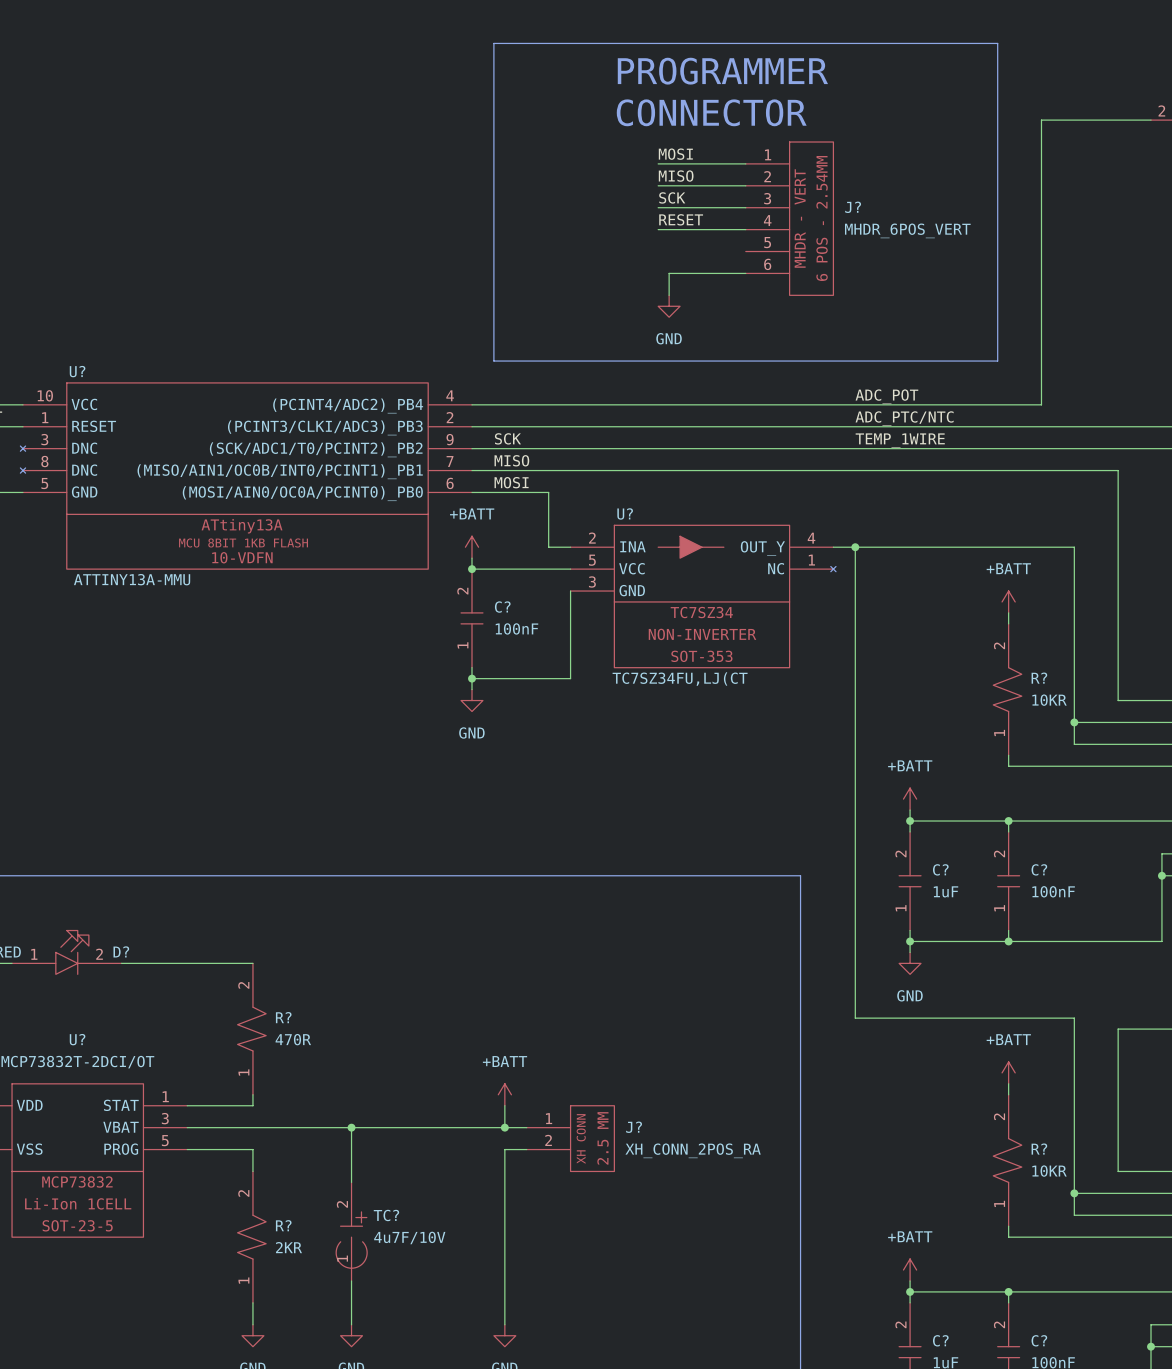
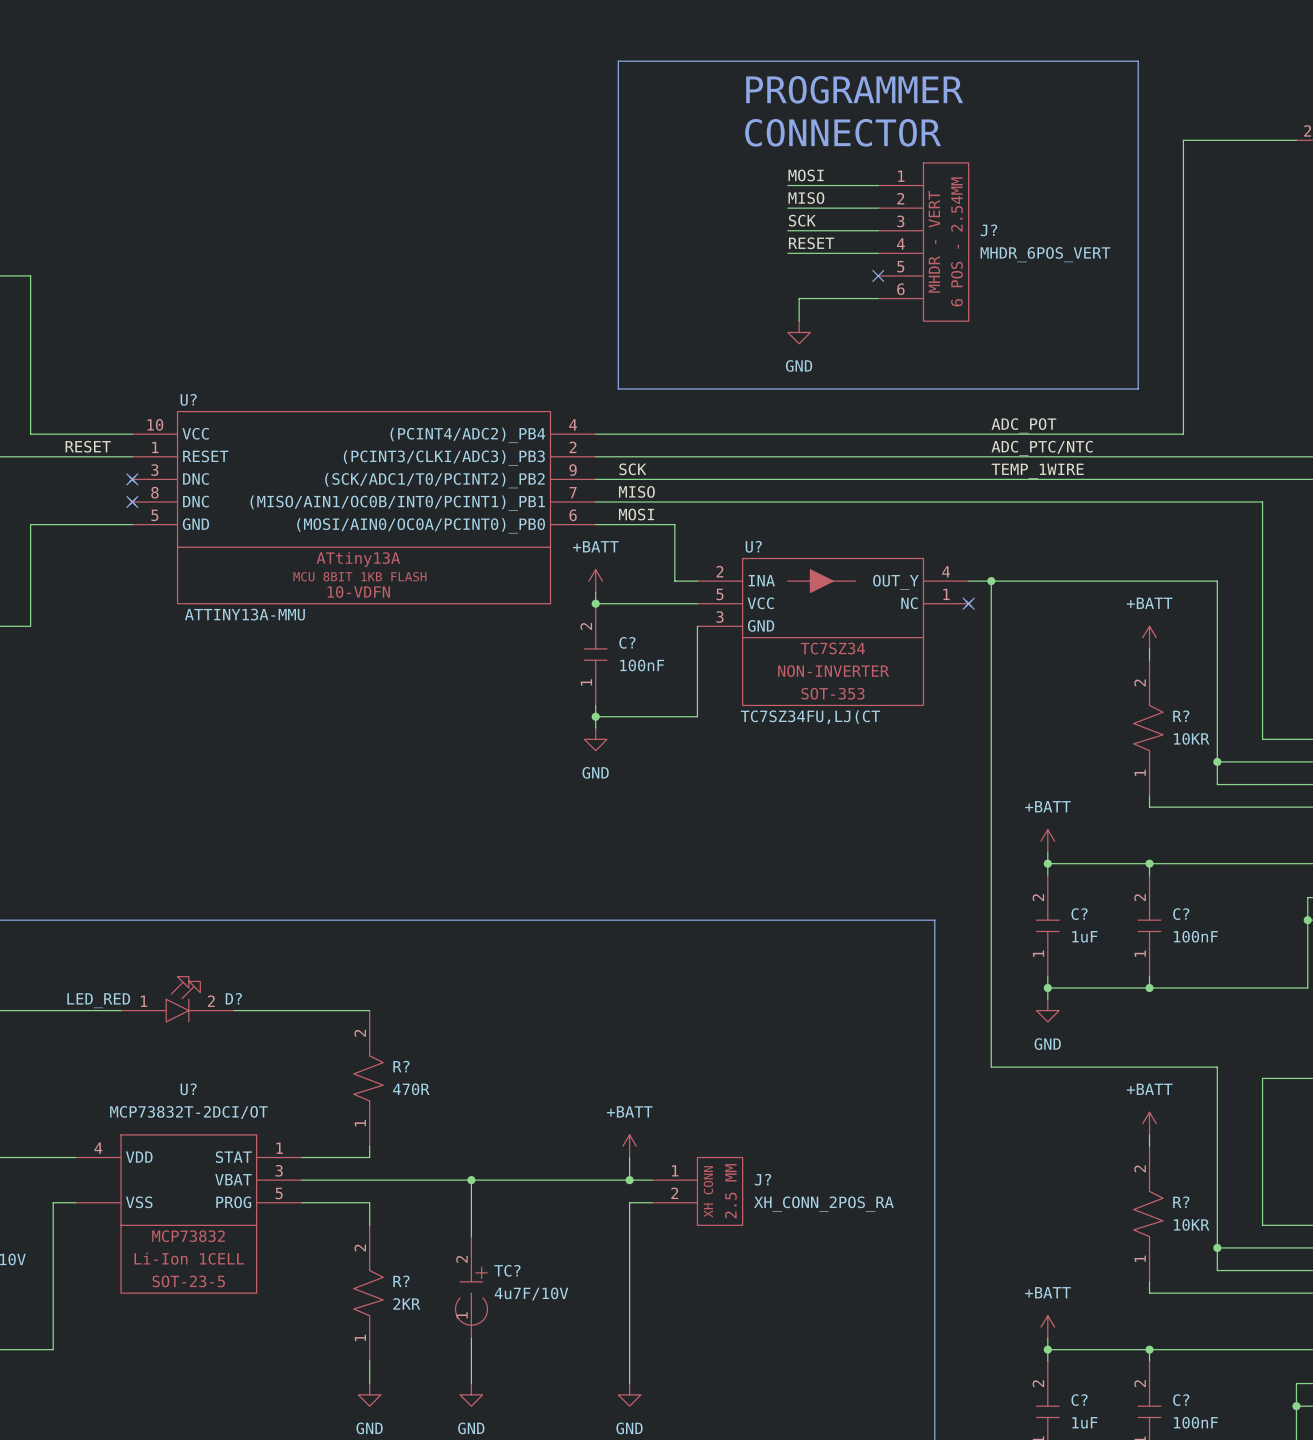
no-connect mark: none -> (878, 275)
no-connect mark: none -> (132, 479)
no-connect mark: none -> (132, 501)
no-connect mark: none -> (968, 603)

